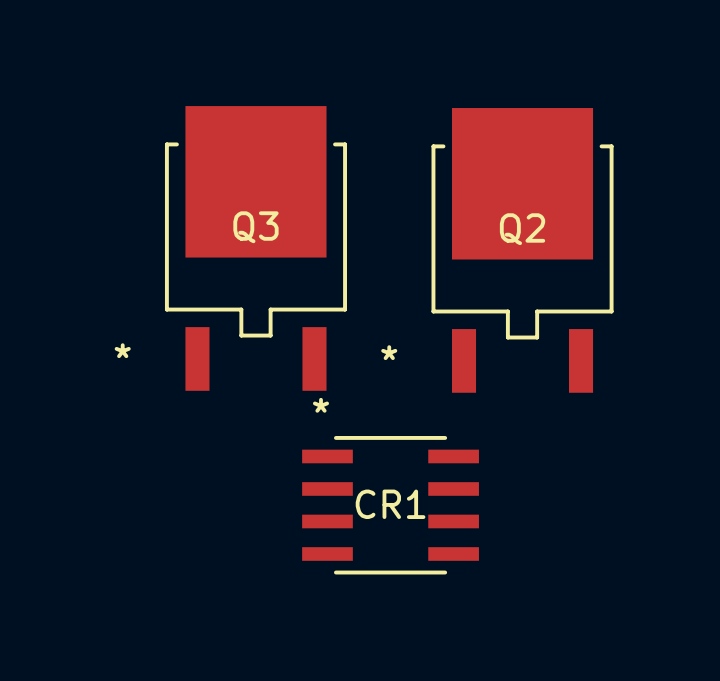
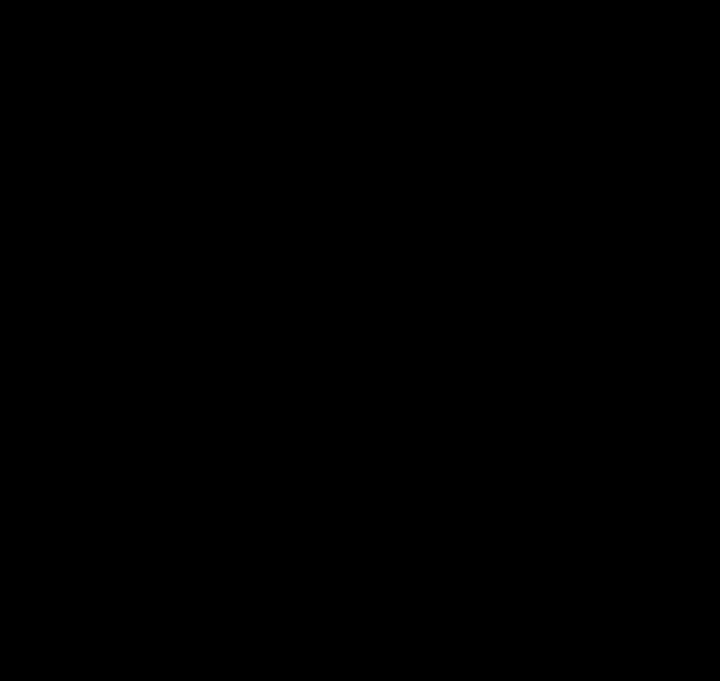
Q3: (255, 248) -> none
Q2: (522, 250) -> none
CR1: (390, 505) -> none

